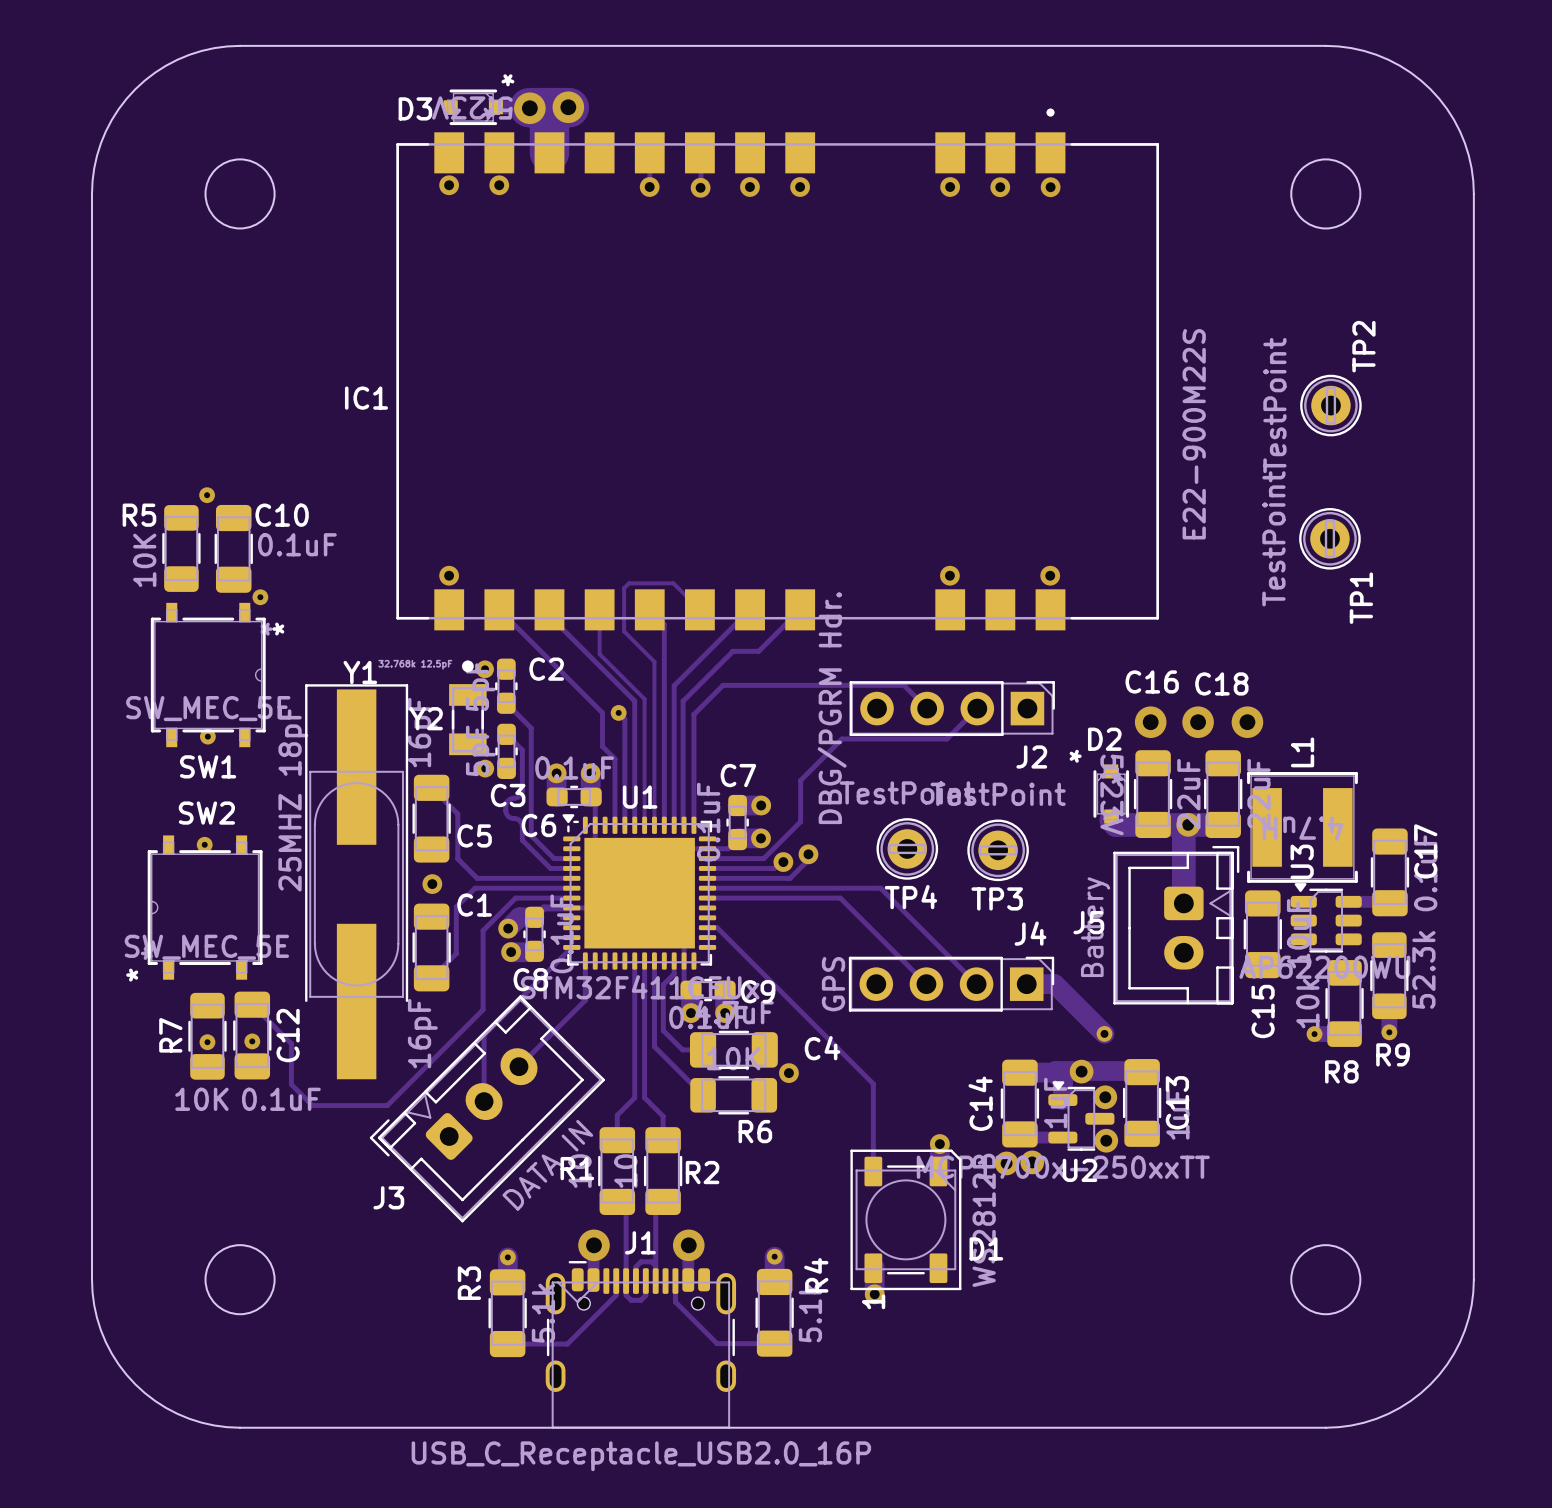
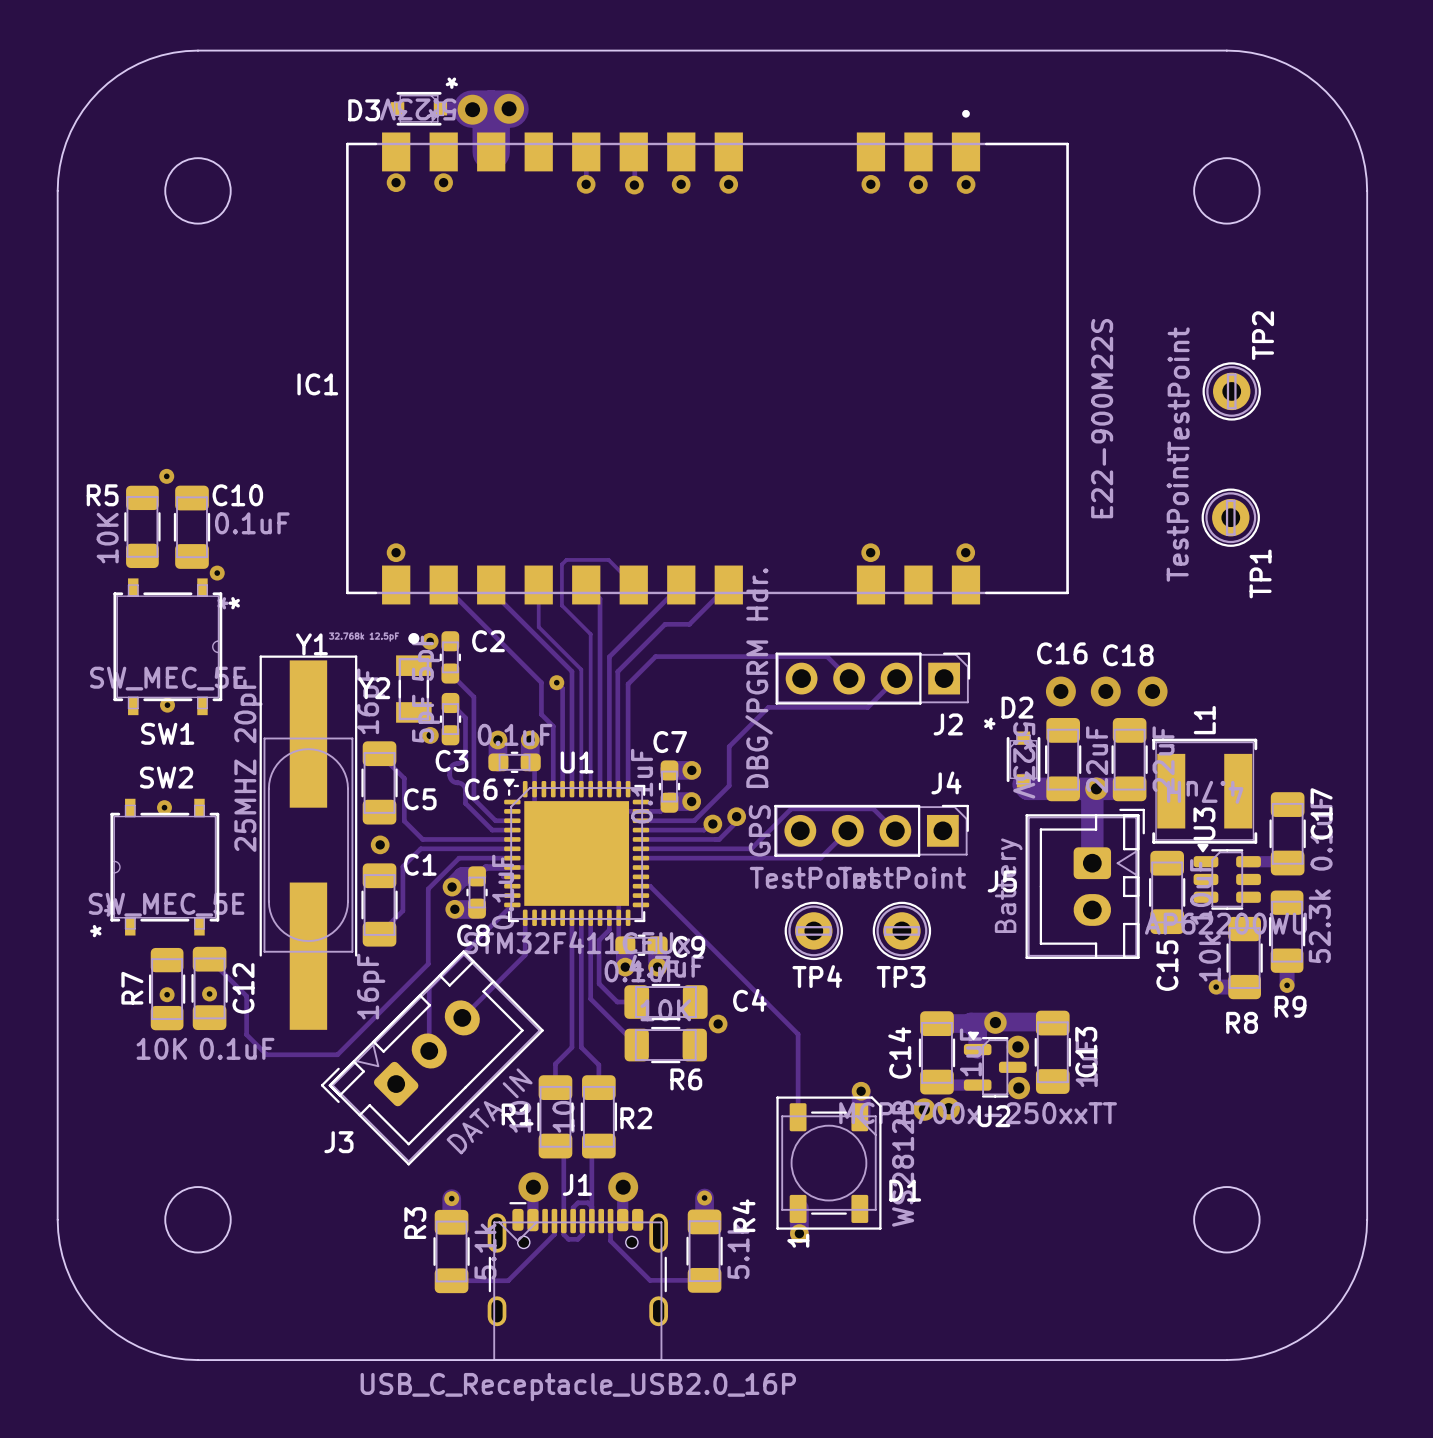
Y1 value: 25MHZ 18pF (293, 798) -> 25MHZ 20pF (248, 764)
TP4 position: (907, 848) -> (813, 930)
TP3 position: (998, 850) -> (901, 930)
track: (823, 888) (880, 888) (976, 984) -> (751, 848) (791, 808) (873, 808) (895, 830)
track: (840, 898) (926, 984) -> (766, 858) (820, 858) (847, 830)
J4 position: (951, 984) -> (871, 830)
track: (1026, 984) (1054, 984) (1104, 1033) -> none
via: (1104, 1033) -> none

